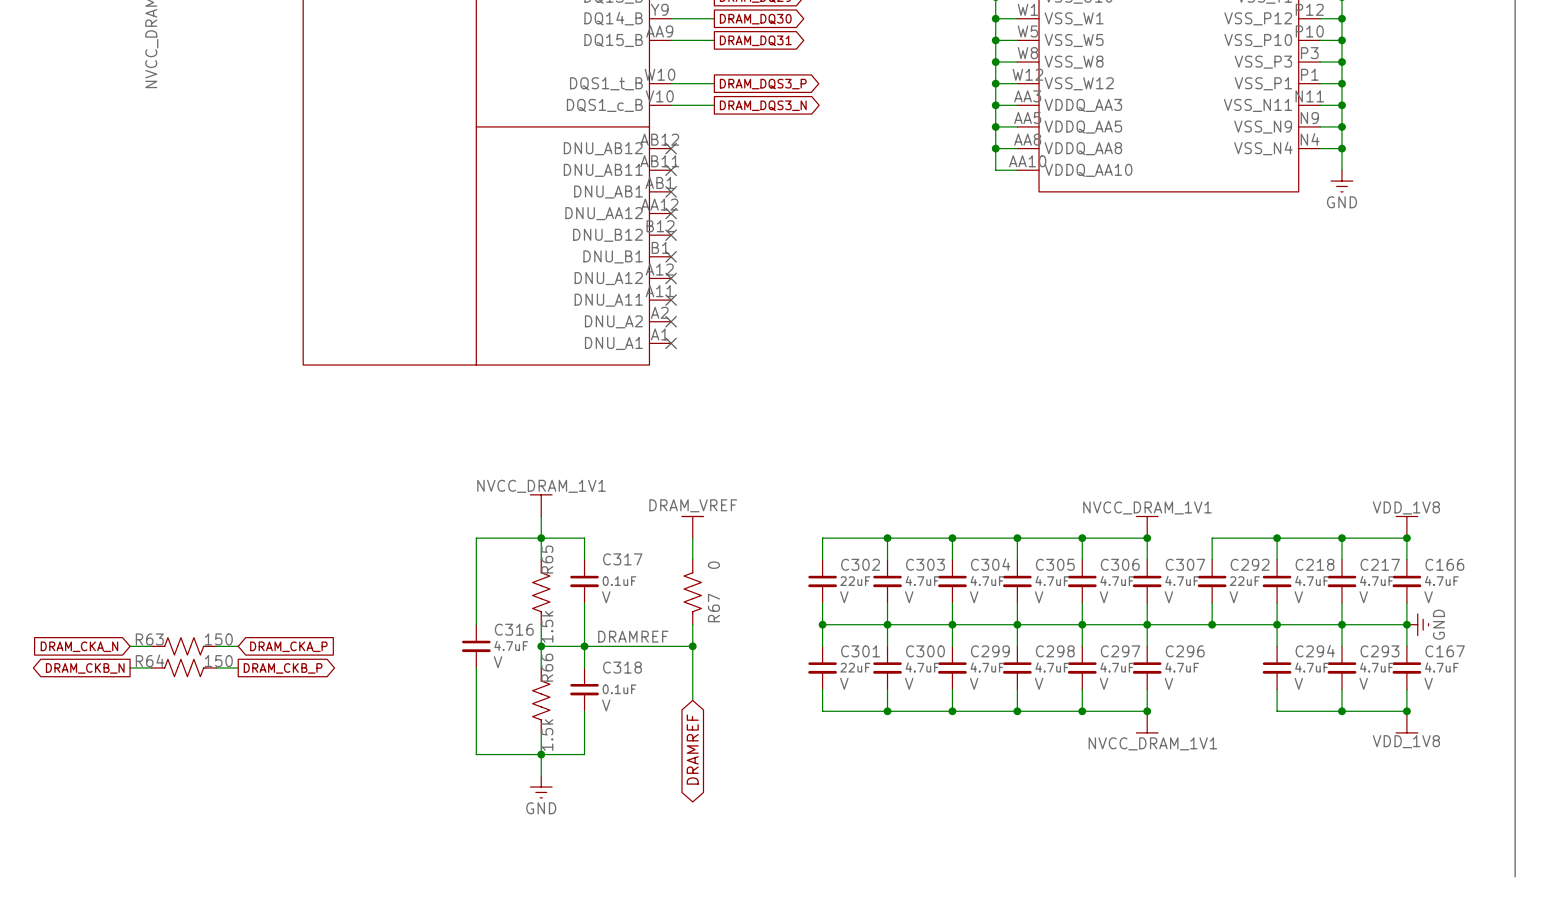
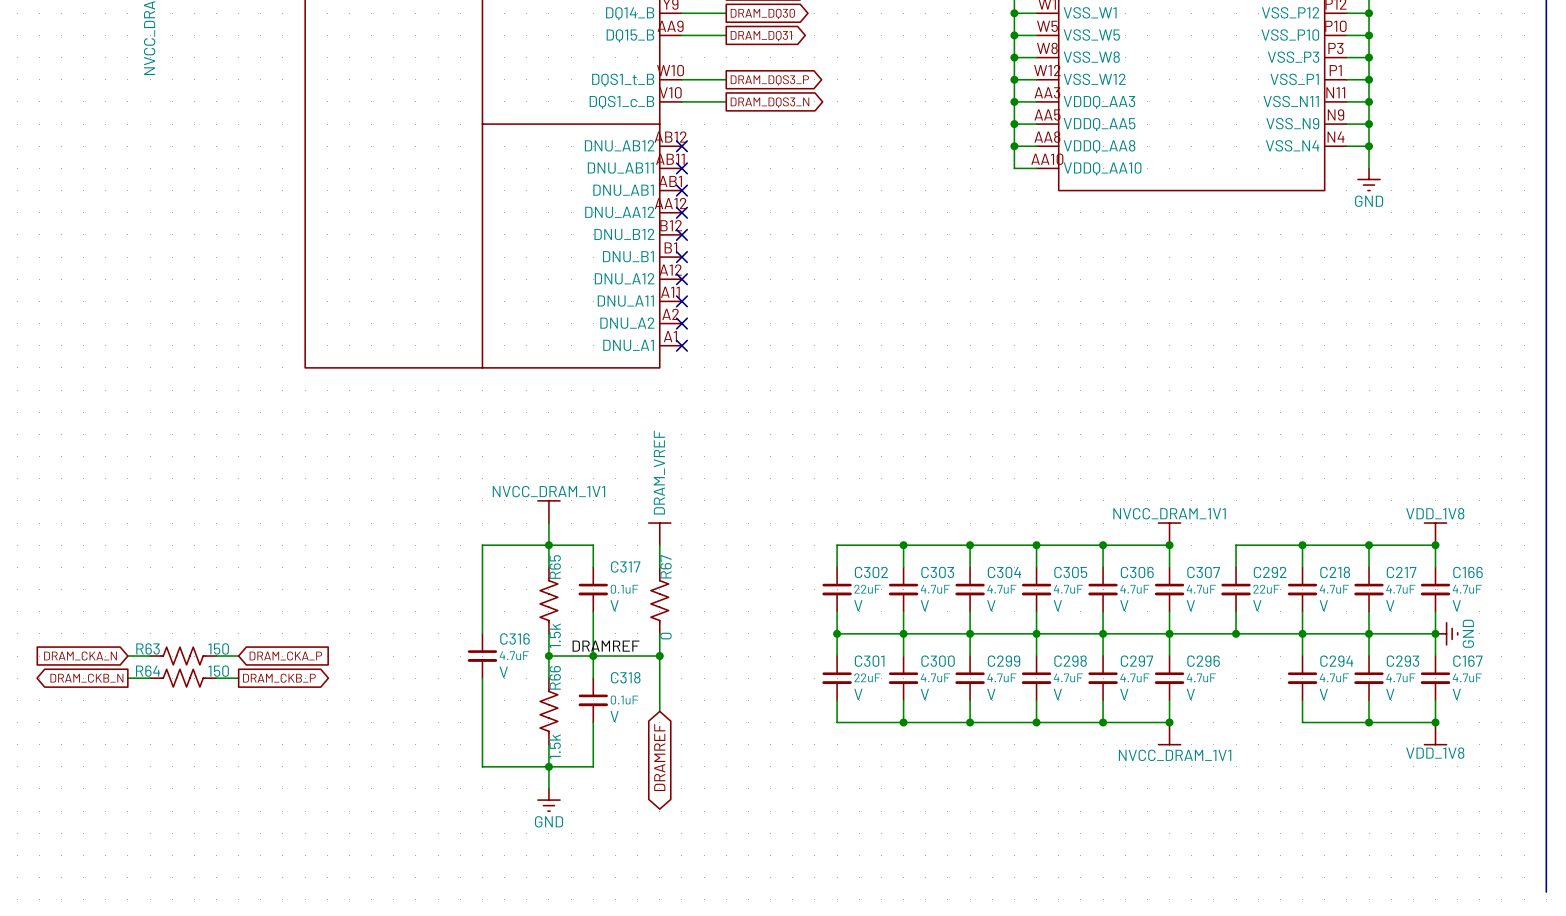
power symbol text rotation: 0° (693, 505) -> 90° counterclockwise (659, 472)
power symbol position: DRAM_VREF (692, 527) -> DRAM_VREF (659, 533)
wire: (692, 538) (692, 559) -> (659, 545) (659, 567)
R67 value position: 0 (713, 565) -> 0 (666, 636)
R67 flip: as is (692, 592) -> left-right (659, 600)
R67 position: (692, 592) -> (659, 600)
R67 name position: R67 (713, 607) -> R67 (666, 566)
wire: (692, 624) (692, 700) -> (659, 633) (659, 711)
label position: DRAMREF (633, 636) -> DRAMREF (606, 646)
wire: (649, 646) (692, 646) -> none
junction position: (692, 646) -> (659, 656)
global label position: DRAMREF (692, 749) -> DRAMREF (659, 757)

